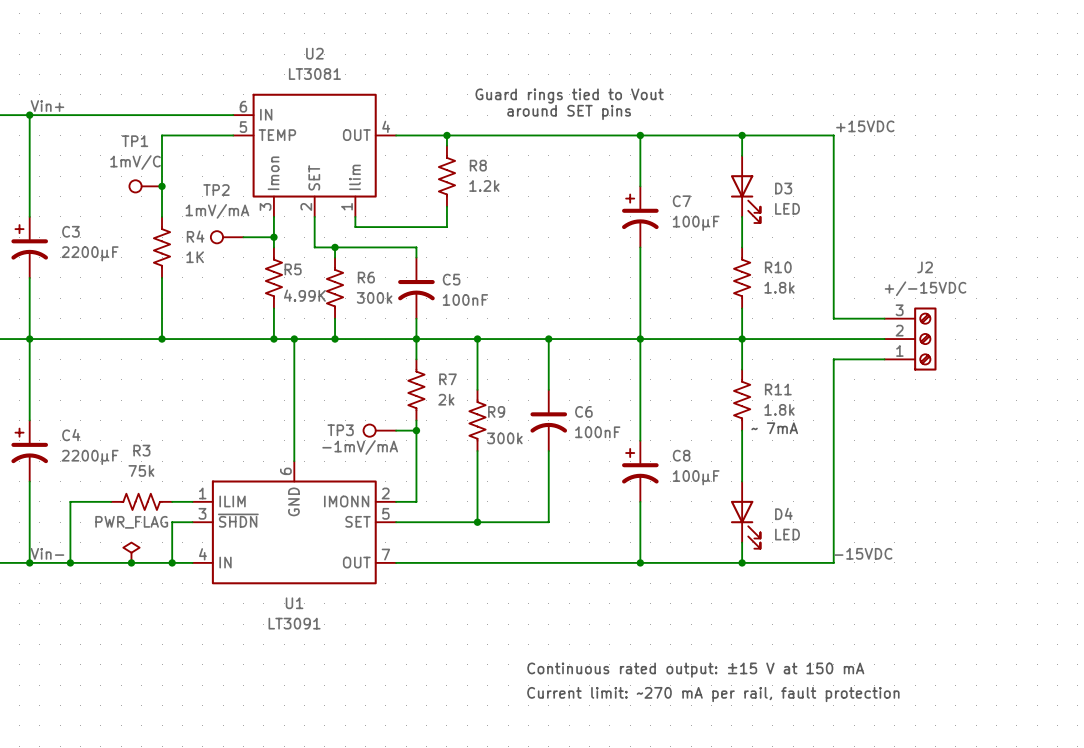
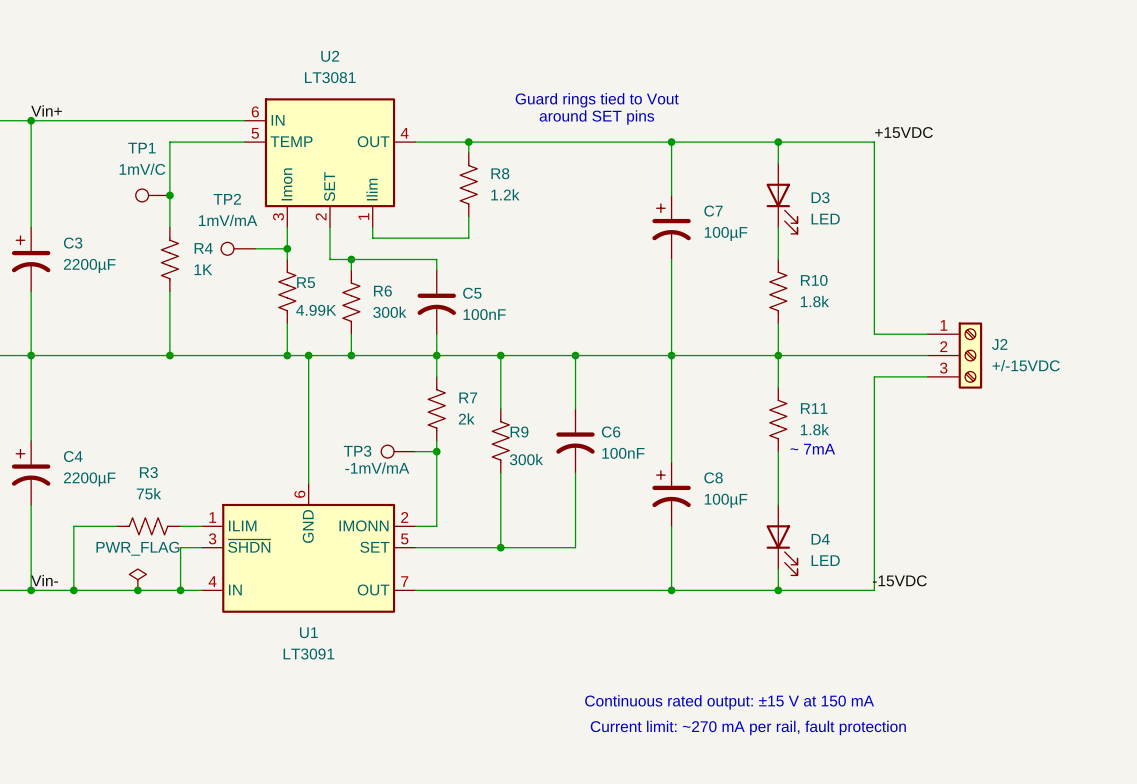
J2 name position: J2 (925, 267) -> J2 (999, 344)
J2 value position: +/-15VDC (925, 288) -> +/-15VDC (1026, 365)
J2 flip: as is (925, 339) -> up-down (970, 355)

